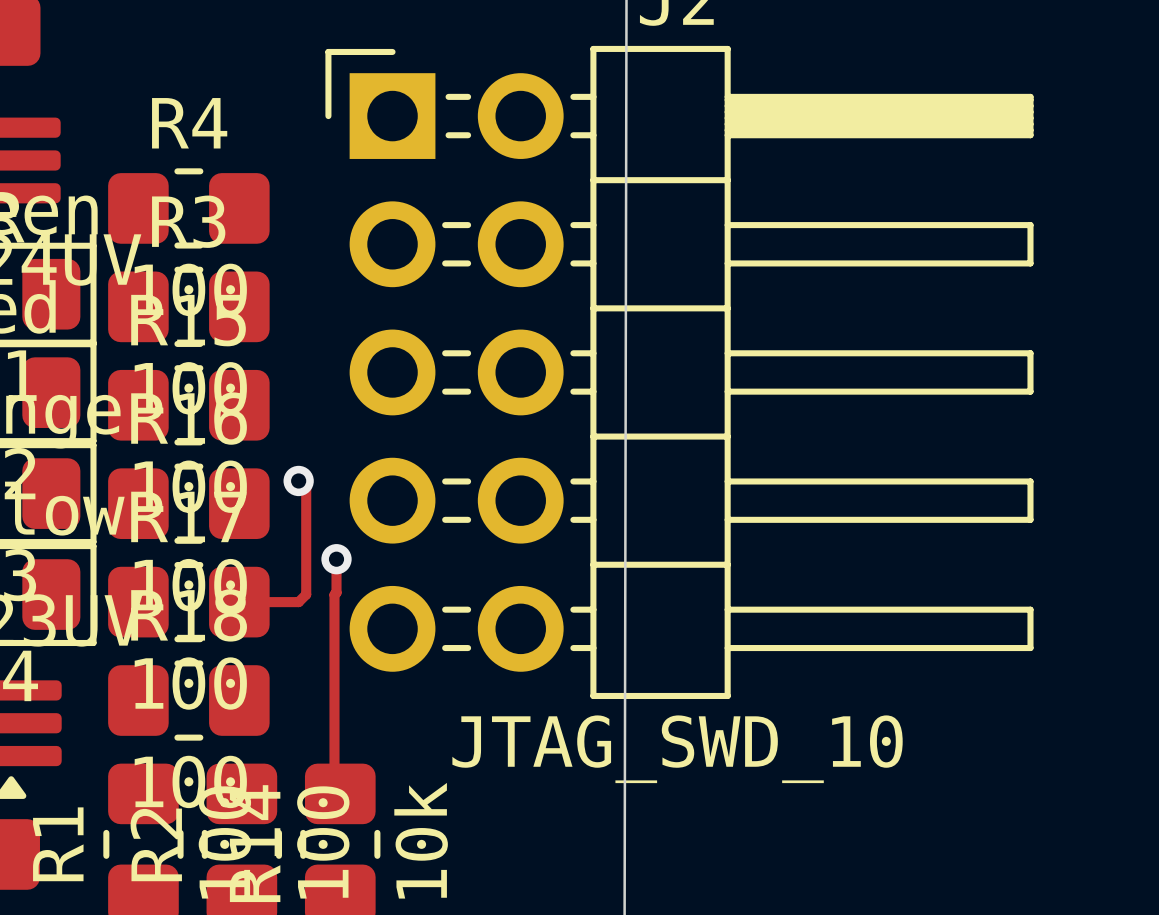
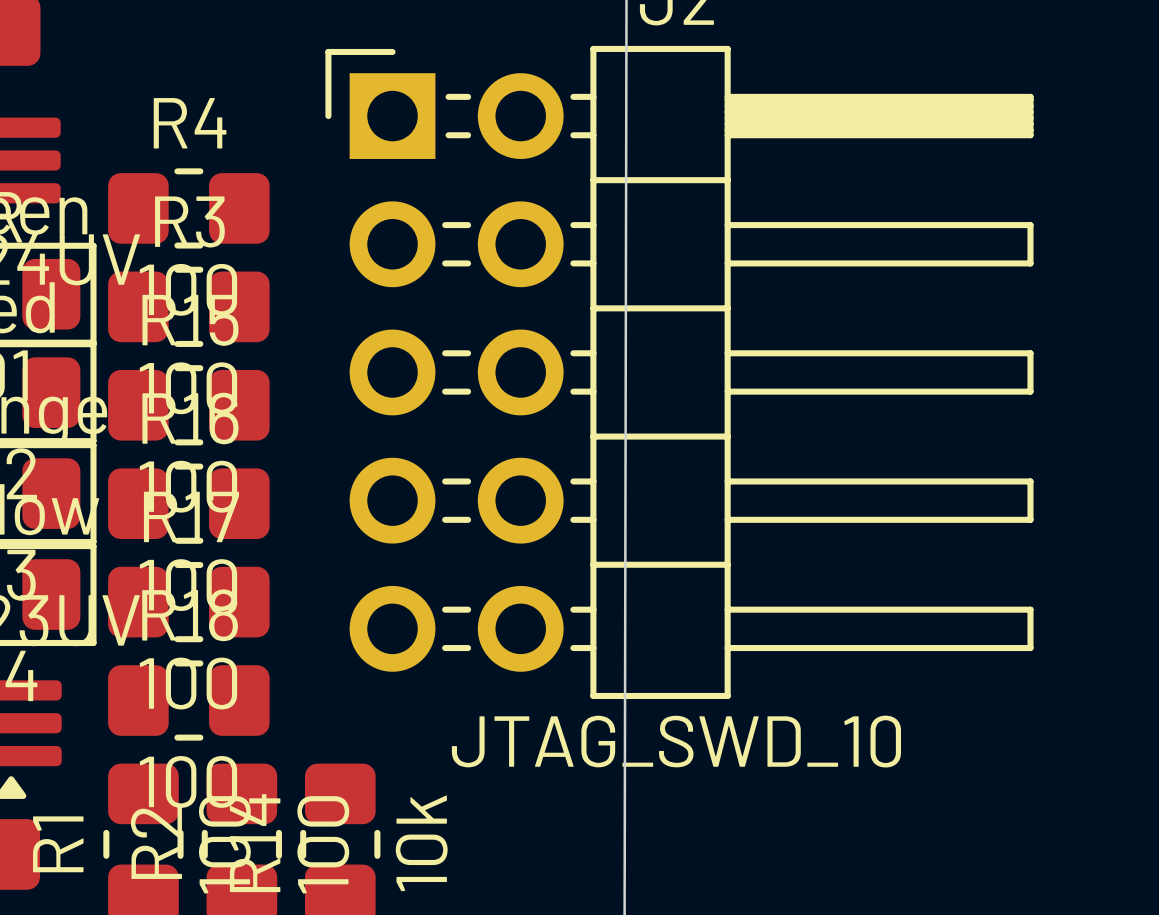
track: (298, 480) (306, 488) (306, 594) (298, 602) (239, 602) -> none
via: (298, 480) -> none
track: (336, 559) (336, 592) (334, 594) (334, 788) (340, 793) -> none
via: (336, 559) -> none

